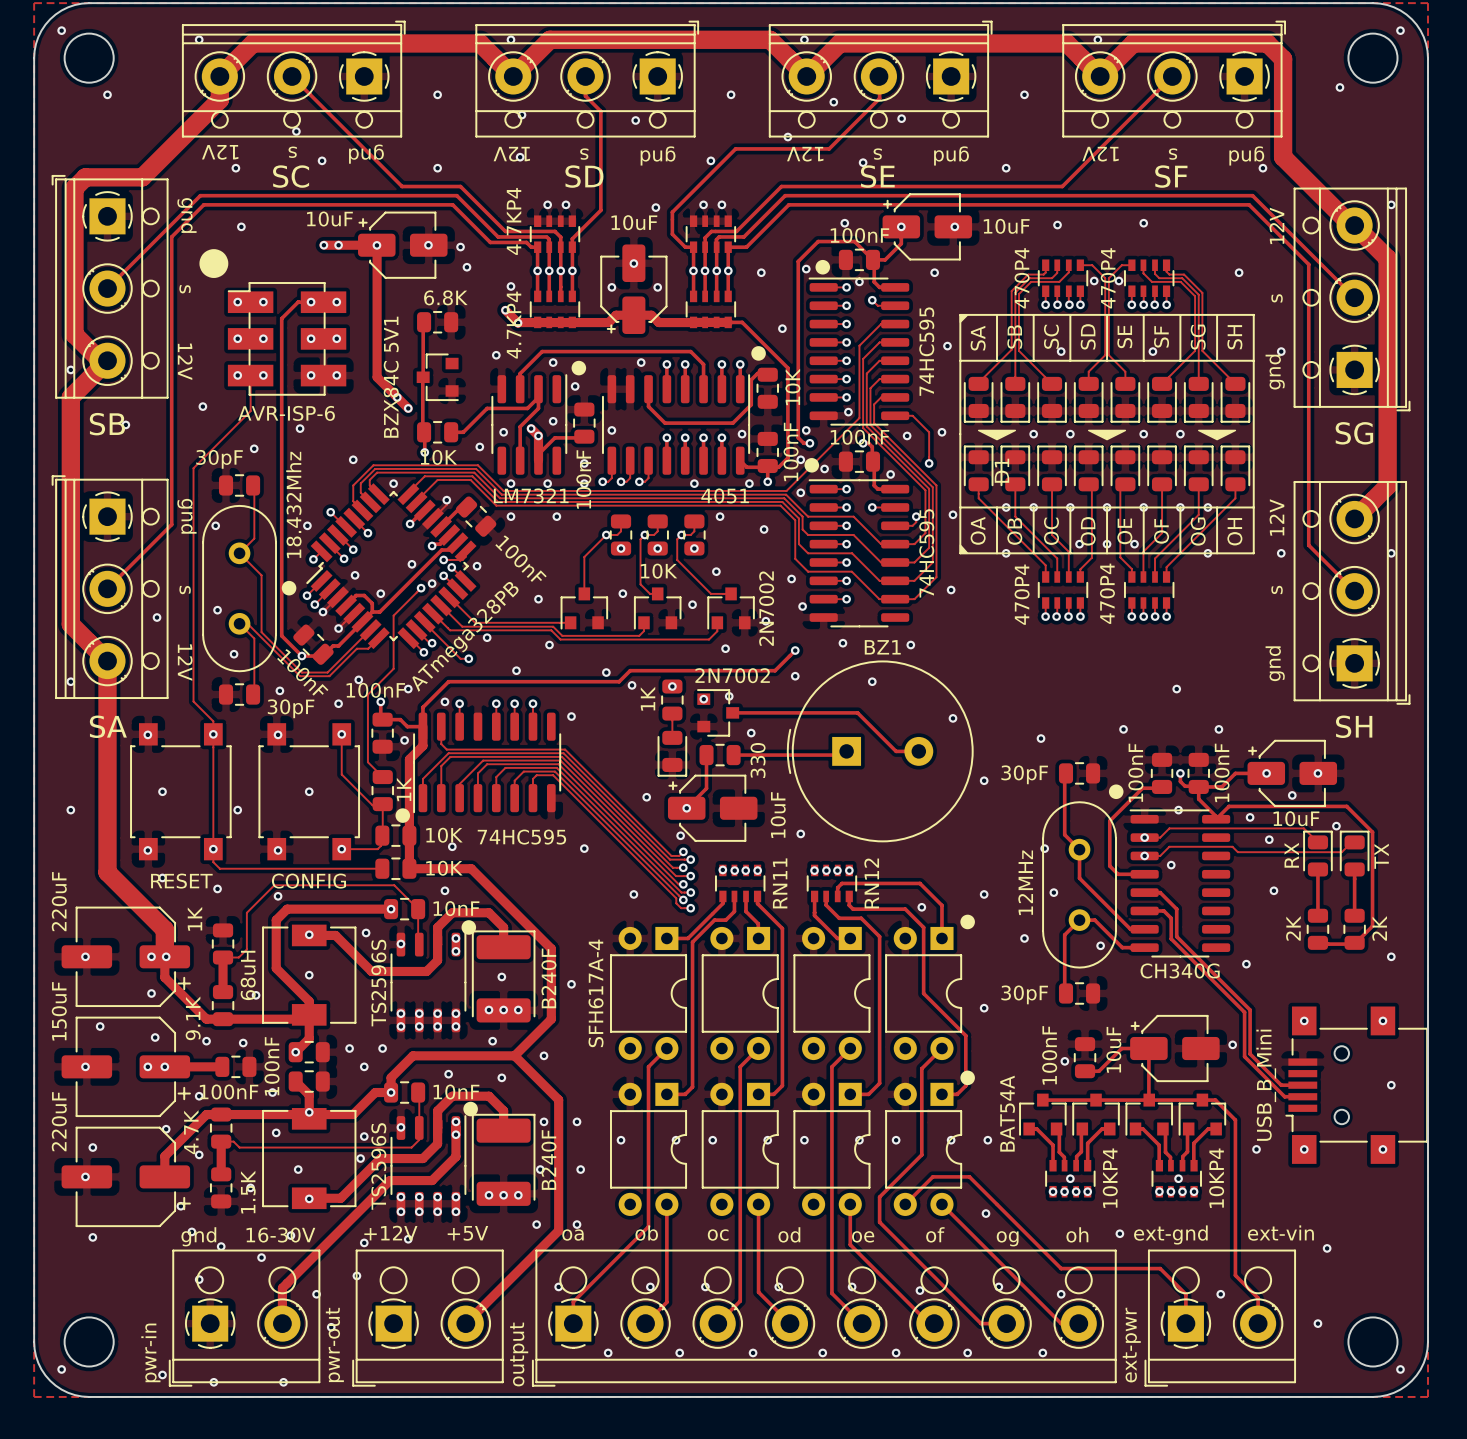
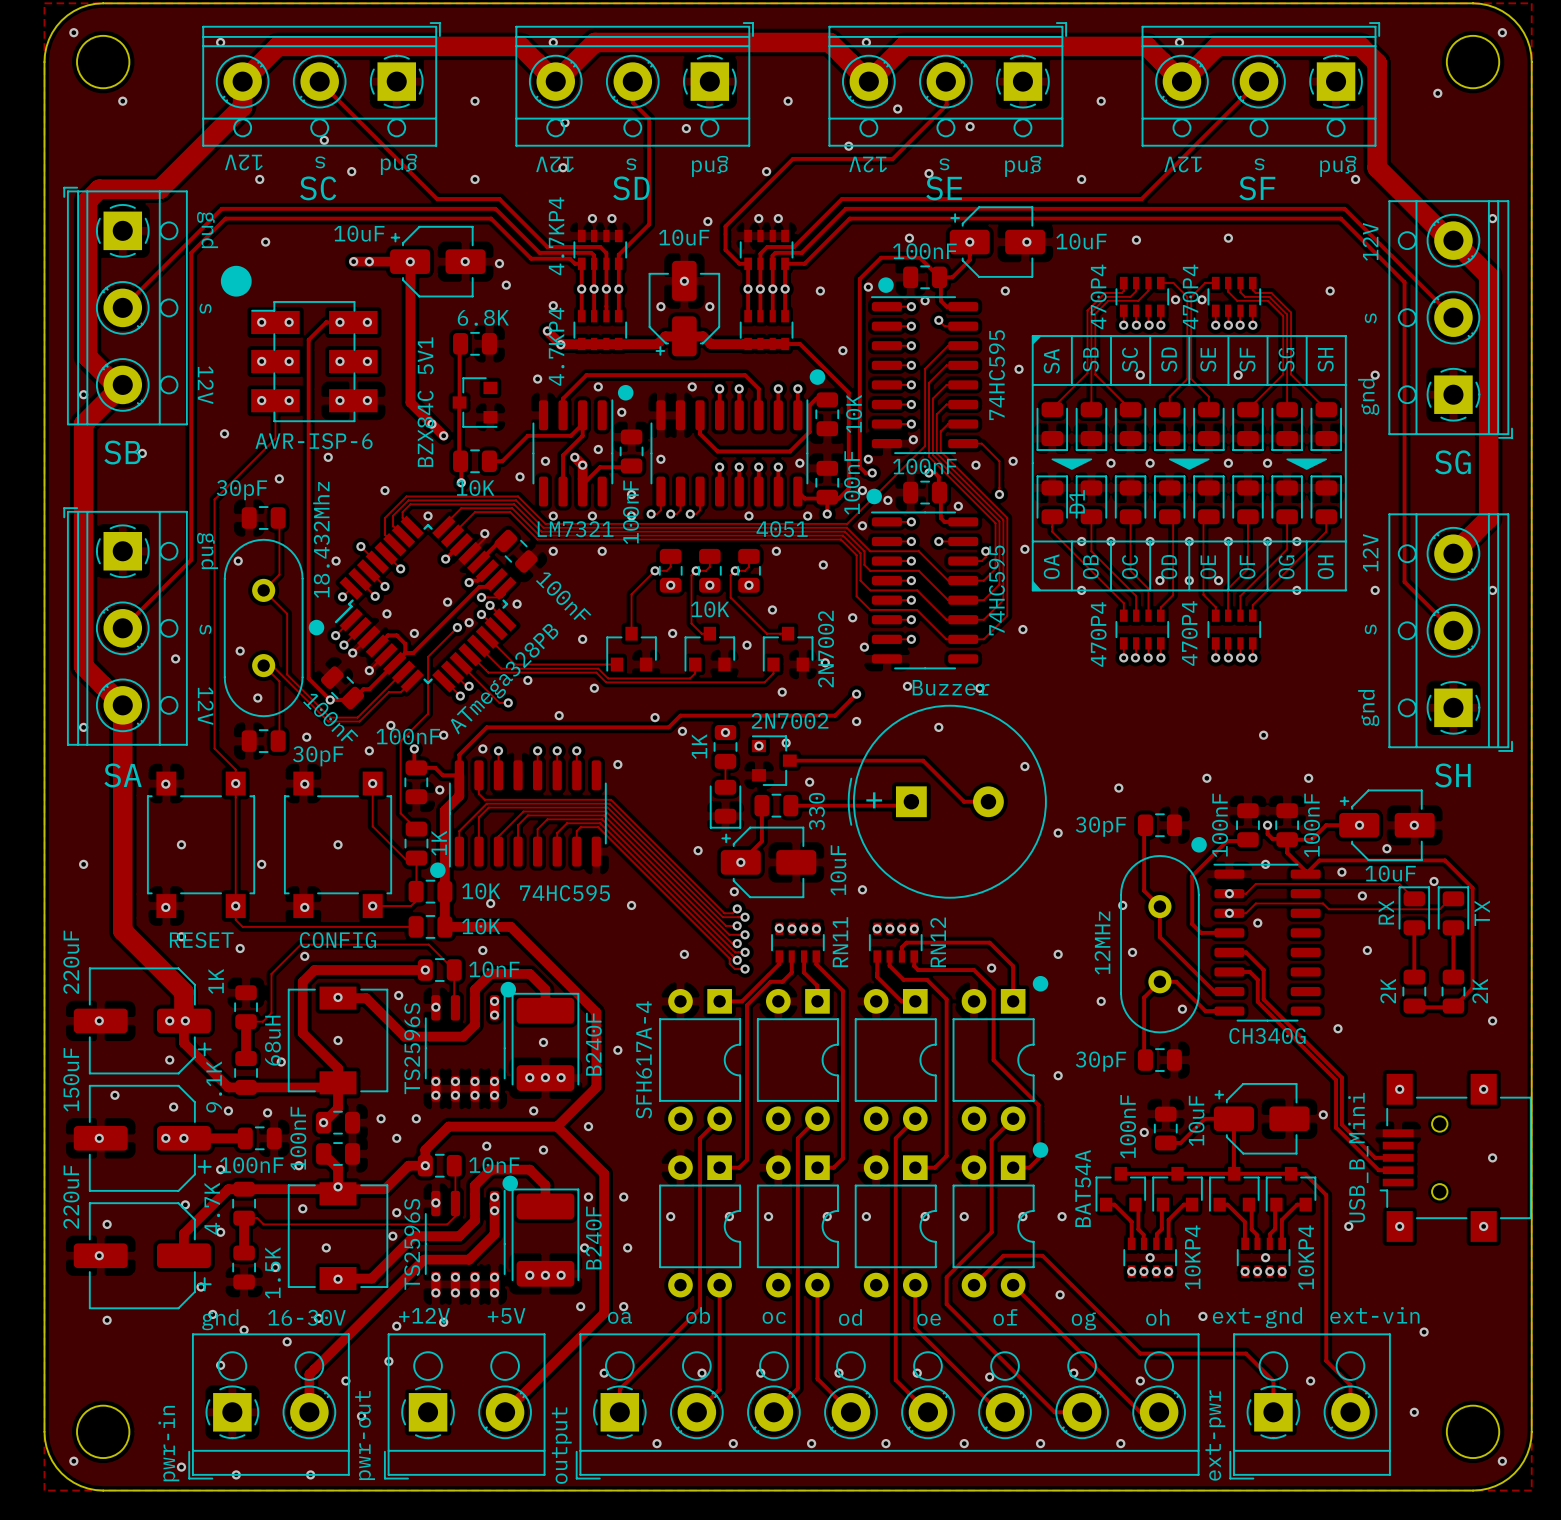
BZ1 value: none -> Buzzer (951, 687)
BZ1 name: BZ1 (882, 647) -> none
text: none -> + (874, 800)

